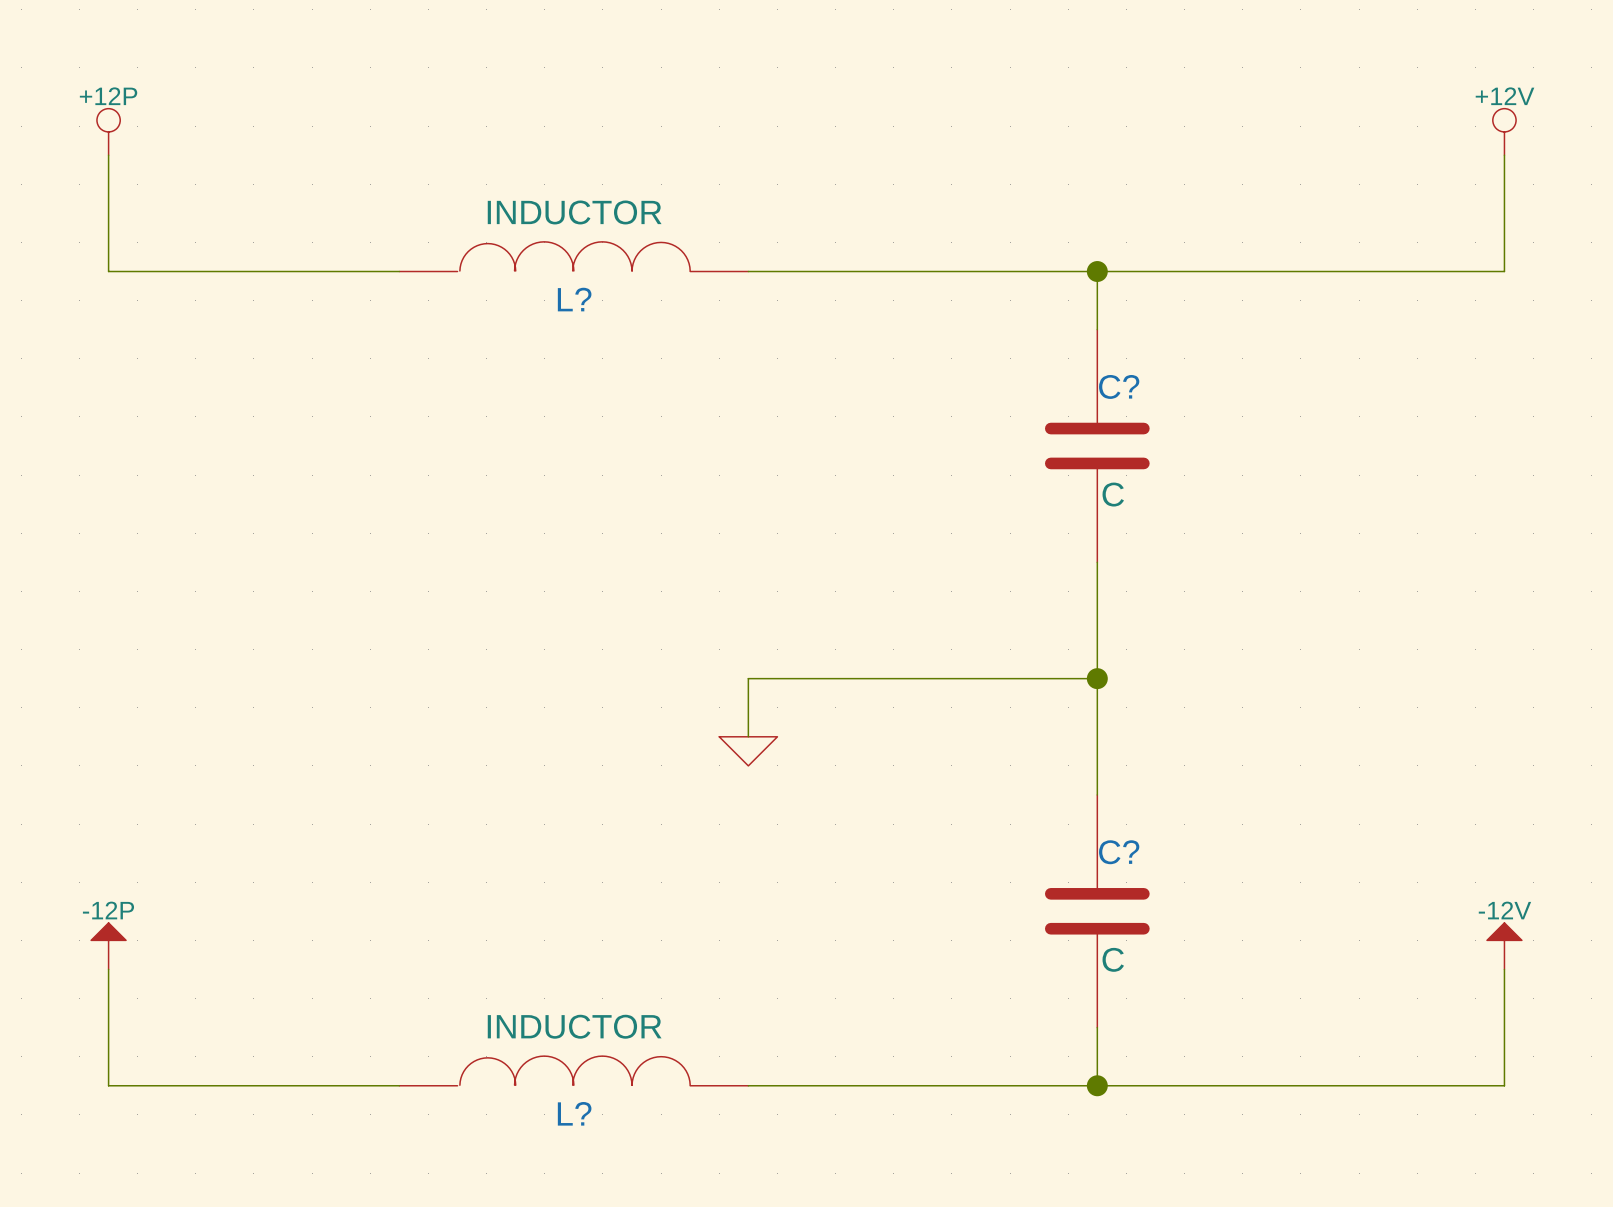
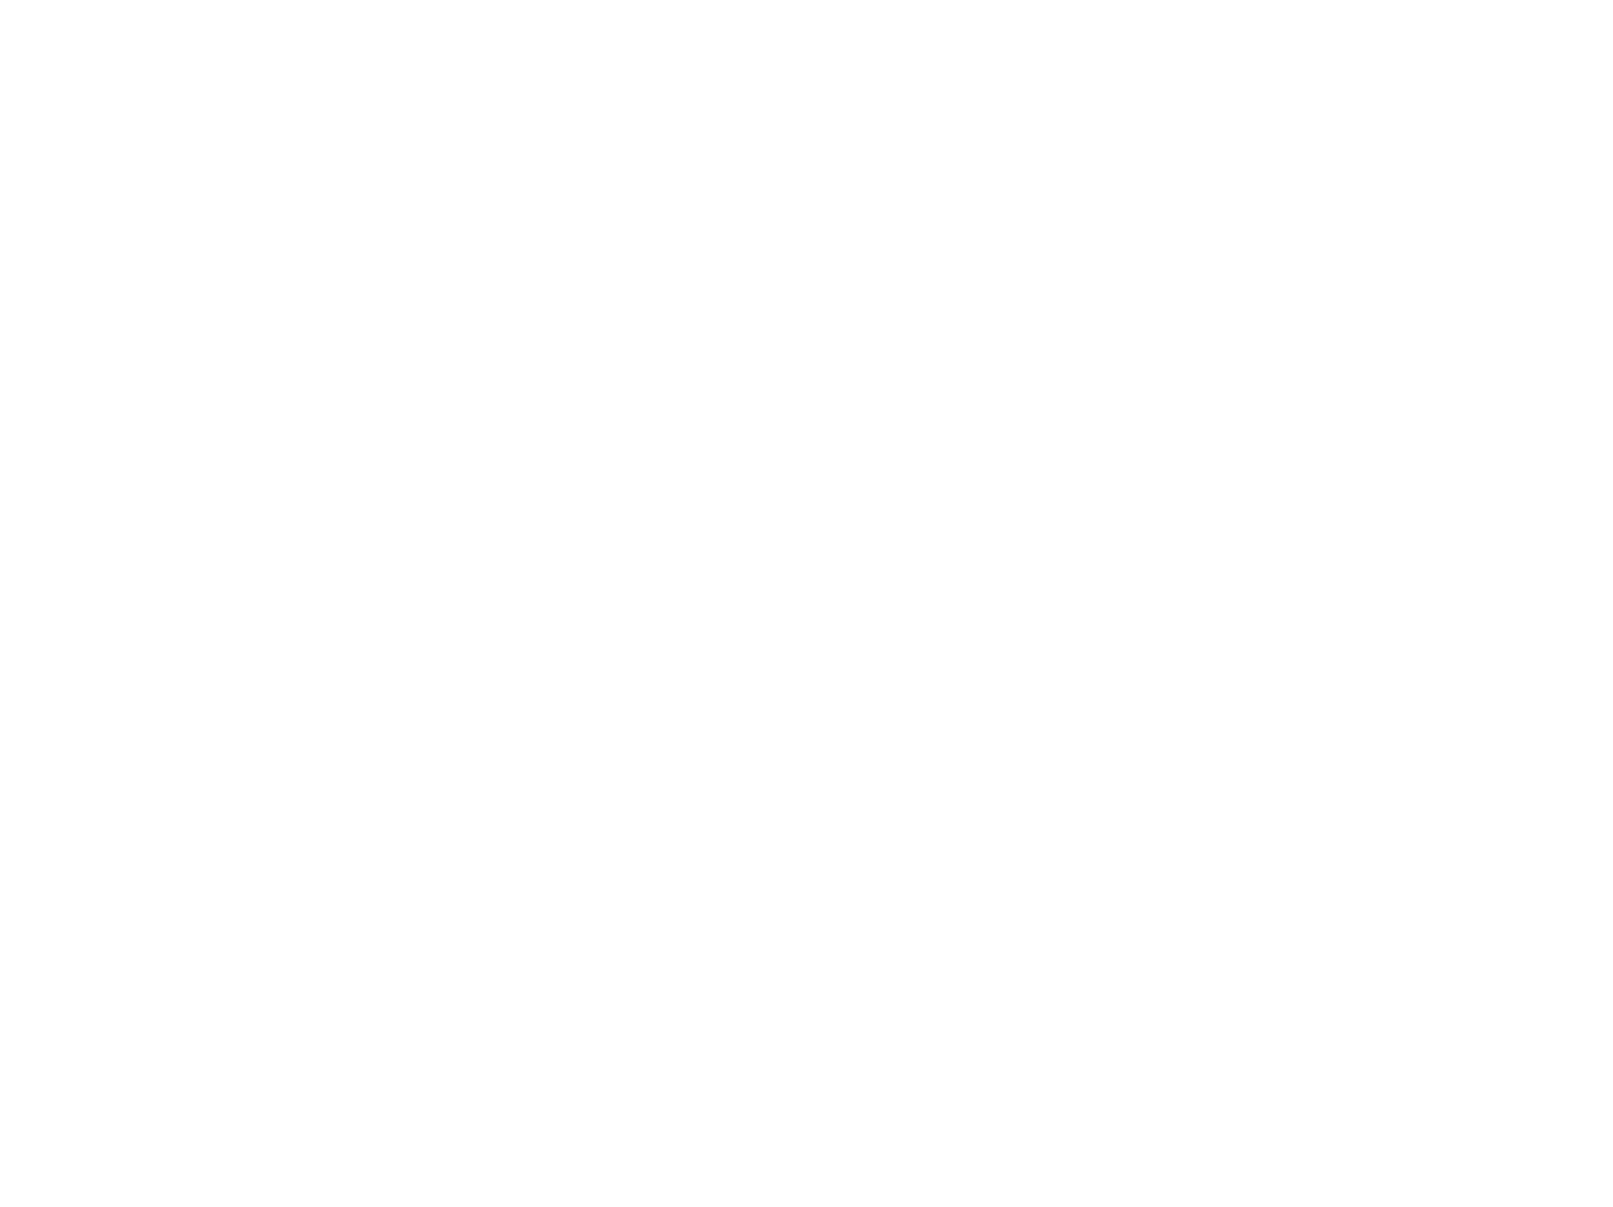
power symbol: +12P (108, 131) -> none
power symbol: +12V (1504, 131) -> none
wire: (108, 155) (108, 271) (399, 271) -> none
wire: (1504, 155) (1504, 271) (748, 271) -> none
L?: INDUCTOR (573, 256) -> none
wire: (1097, 271) (1097, 329) -> none
junction: (1097, 271) -> none
C?: C (1097, 445) -> none
wire: (1097, 562) (1097, 794) -> none
wire: (1097, 678) (748, 678) (748, 736) -> none
junction: (1097, 678) -> none
power symbol: (748, 751) -> none
C?: C (1097, 911) -> none
power symbol: -12P (108, 946) -> none
power symbol: -12V (1504, 946) -> none
wire: (108, 969) (108, 1085) (399, 1085) -> none
wire: (1504, 969) (1504, 1085) (748, 1085) -> none
wire: (1097, 1027) (1097, 1085) -> none
L?: INDUCTOR (573, 1070) -> none
junction: (1097, 1085) -> none

